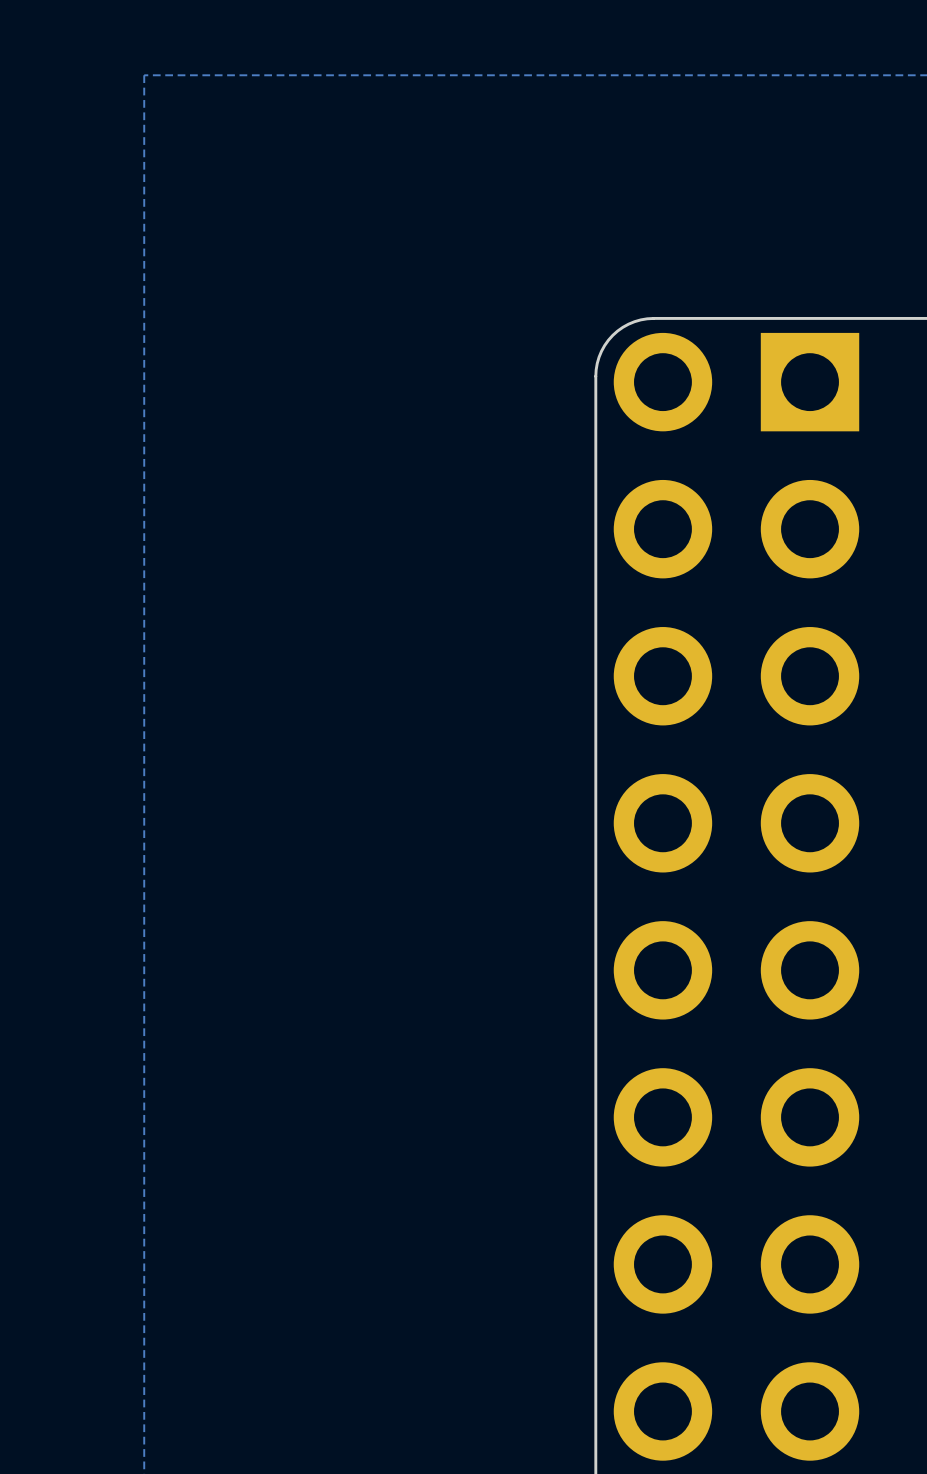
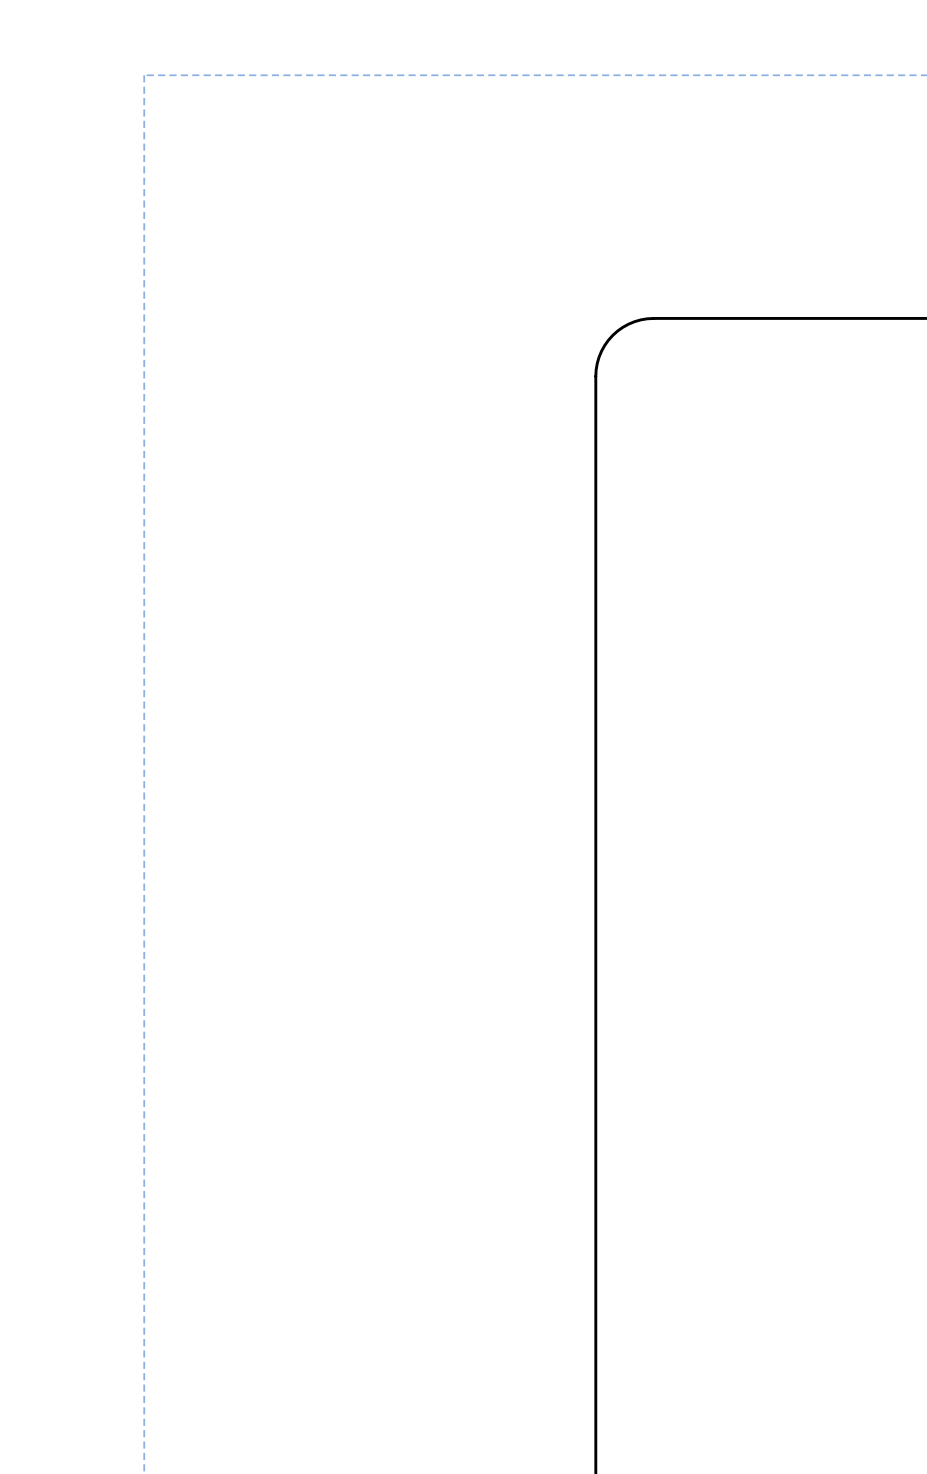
part: (736, 896) -> none

